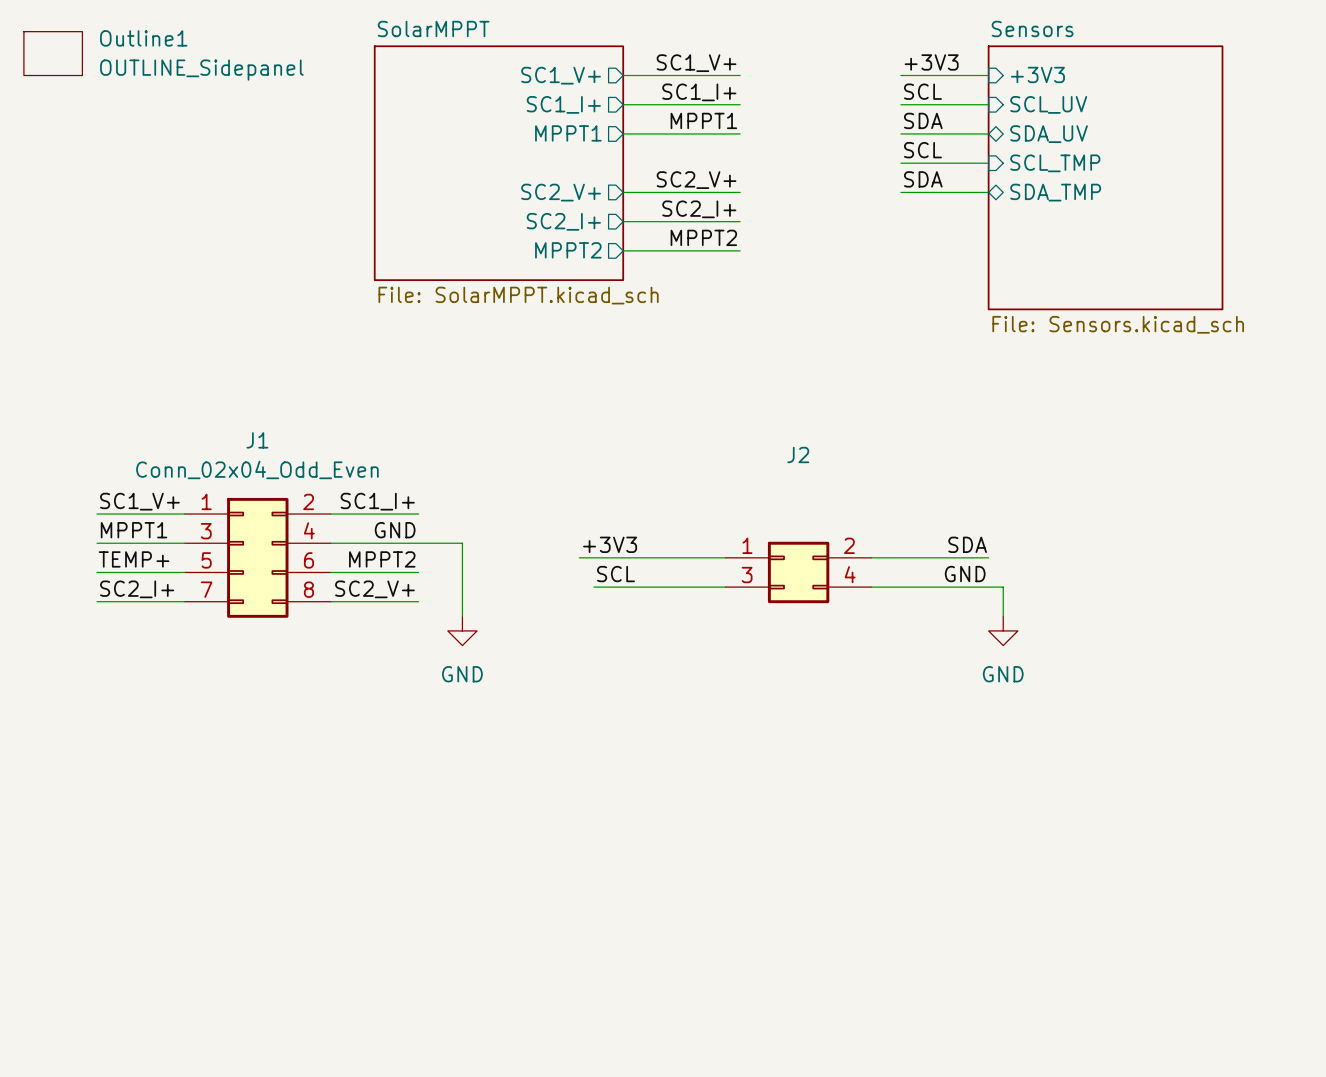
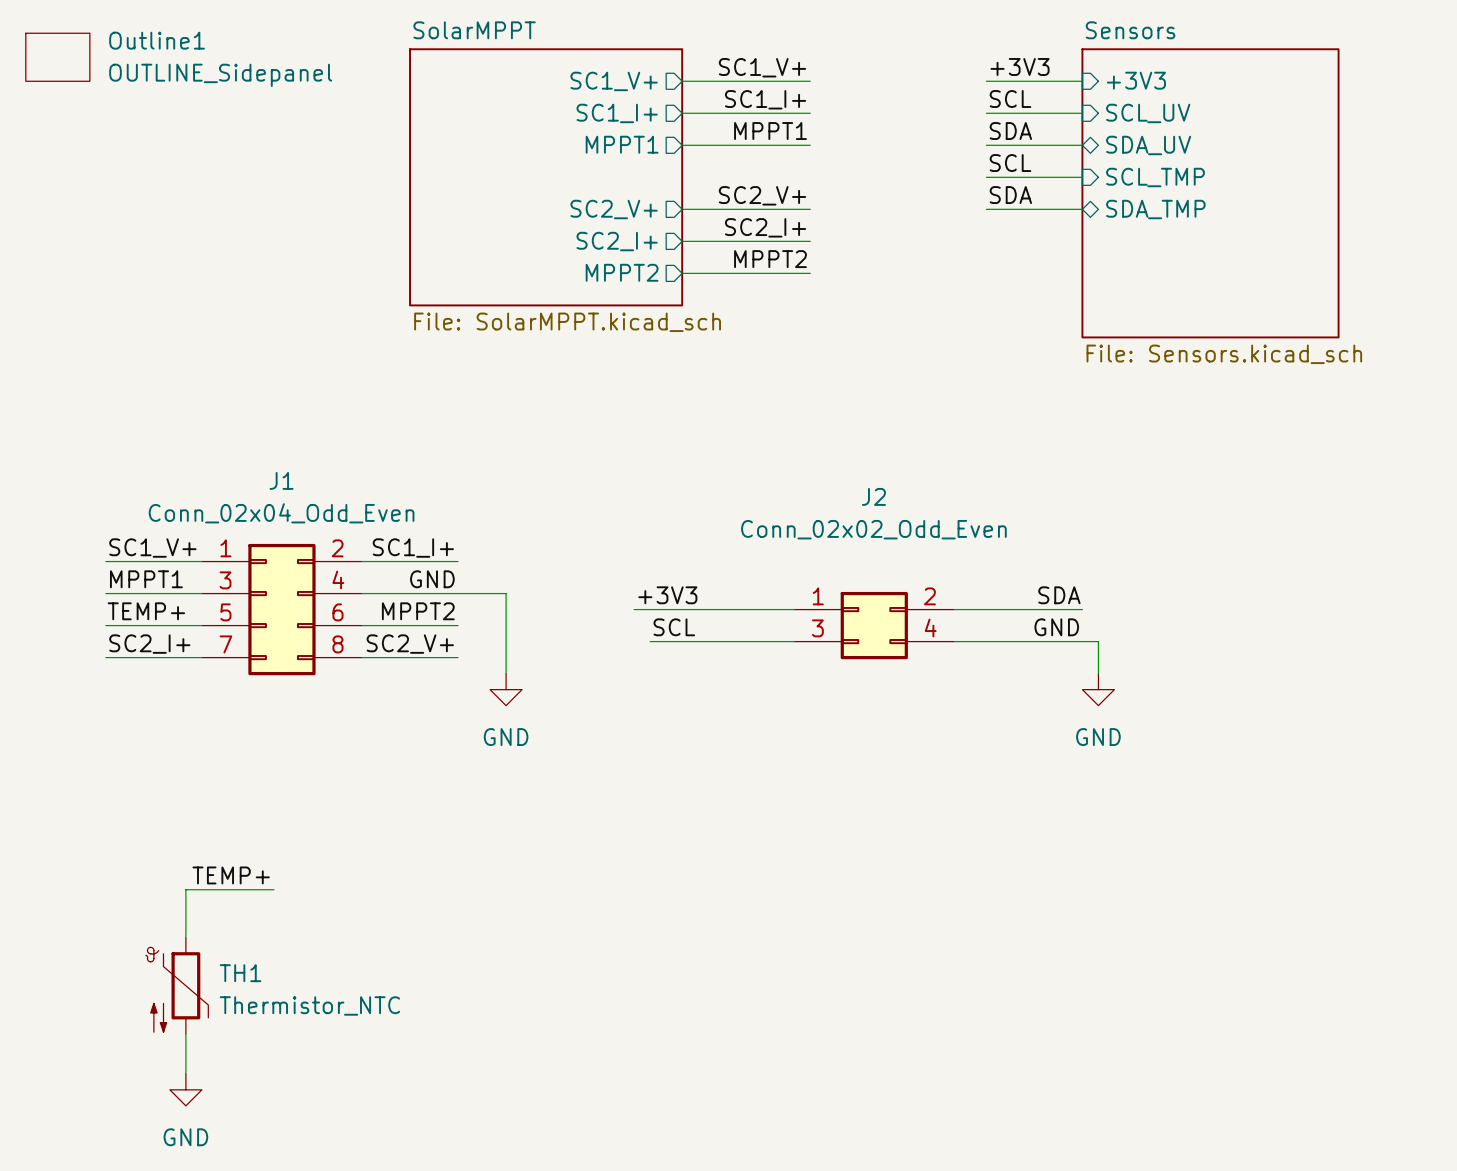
J2 value: none -> Conn_02x02_Odd_Even (873, 529)
label: none -> TEMP+ (231, 875)
wire: none -> (273, 889) (185, 889) (185, 937)
TH1: none -> Thermistor_NTC (177, 985)
wire: none -> (185, 1033) (185, 1073)
power symbol: none -> GND (185, 1089)

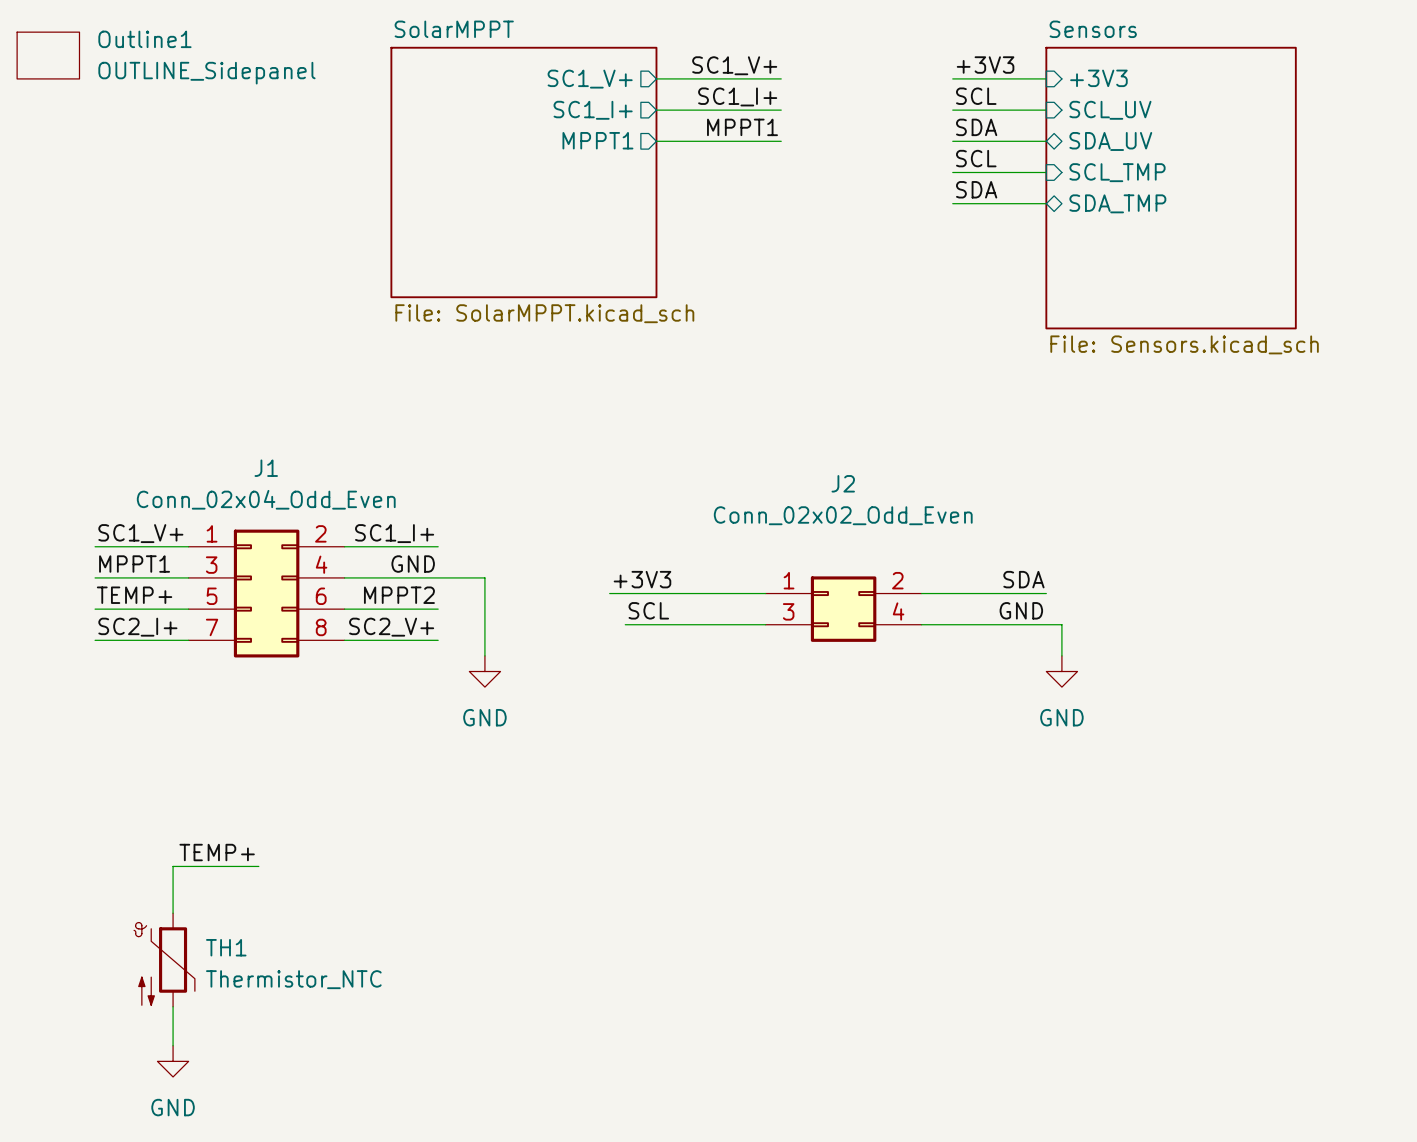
label: SC2_V+ (762, 195) -> none
sheet pin: SC2_V+ (614, 209) -> none
wire: (682, 209) (810, 209) -> none
label: SC2_I+ (765, 227) -> none
sheet pin: SC2_I+ (617, 241) -> none
wire: (682, 241) (810, 241) -> none
label: MPPT2 (770, 259) -> none
sheet pin: MPPT2 (622, 272) -> none
wire: (682, 273) (810, 273) -> none

